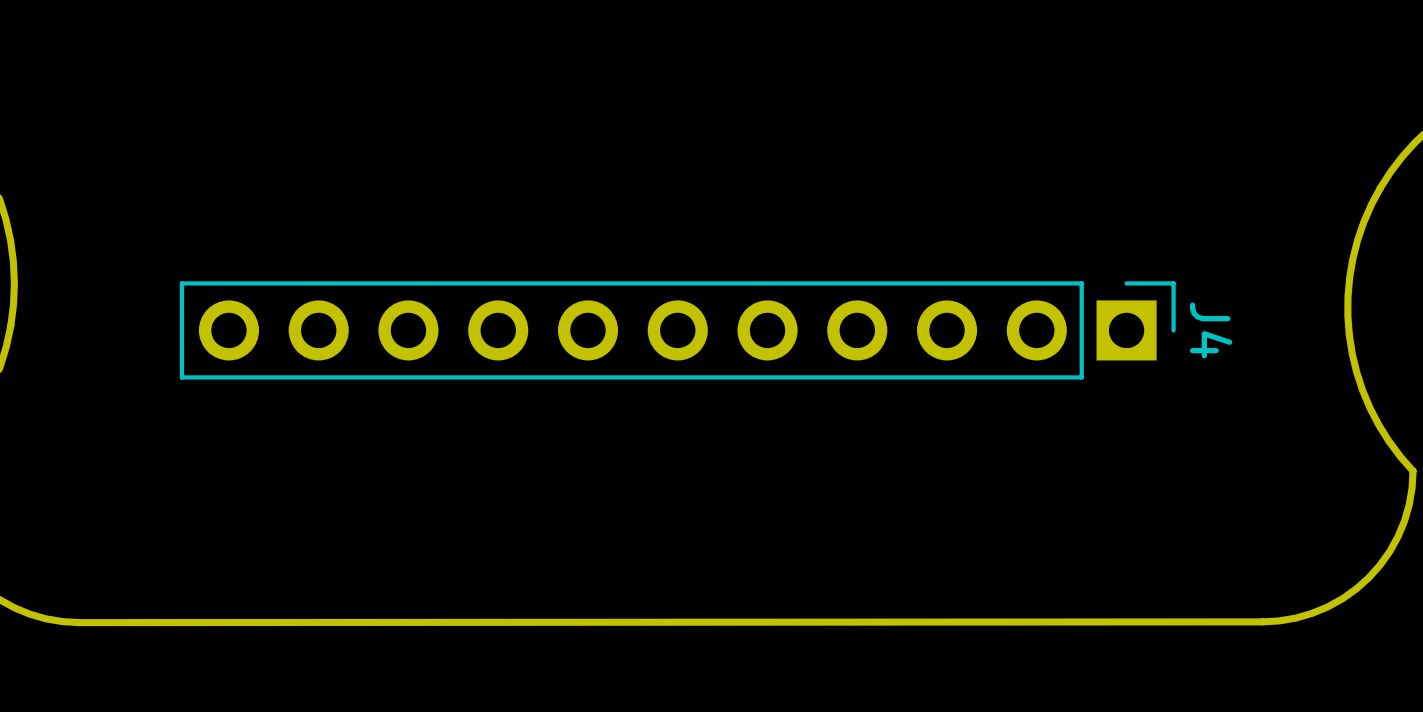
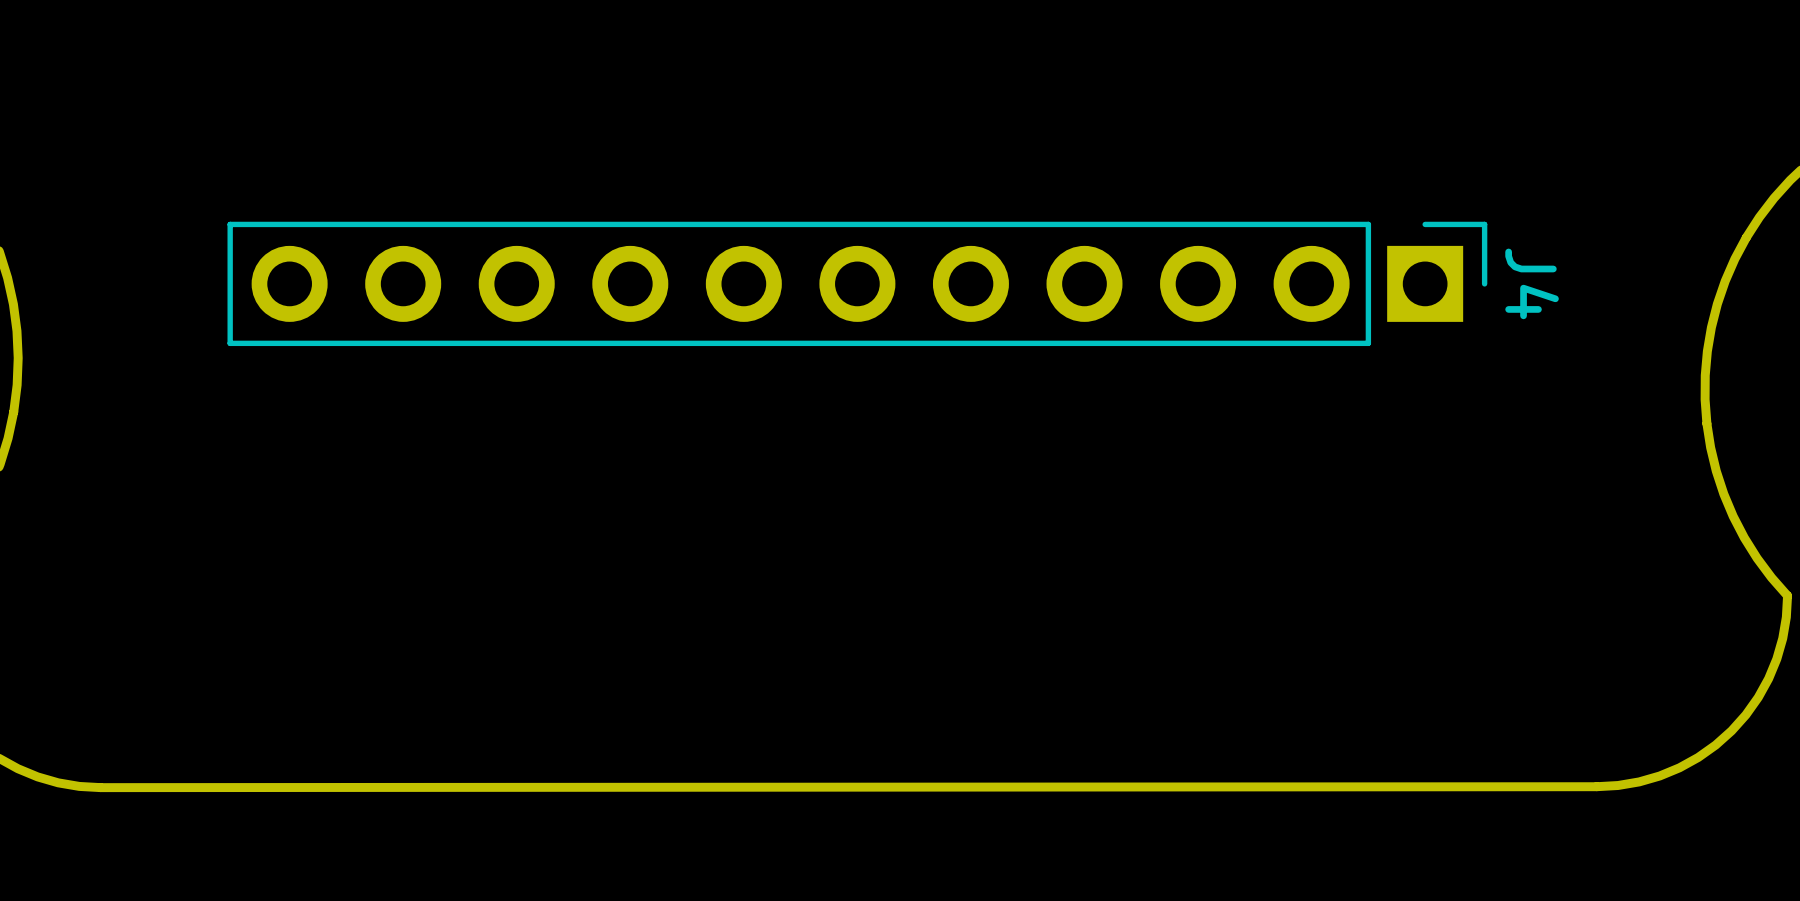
J4 position: (677, 330) -> (857, 283)

